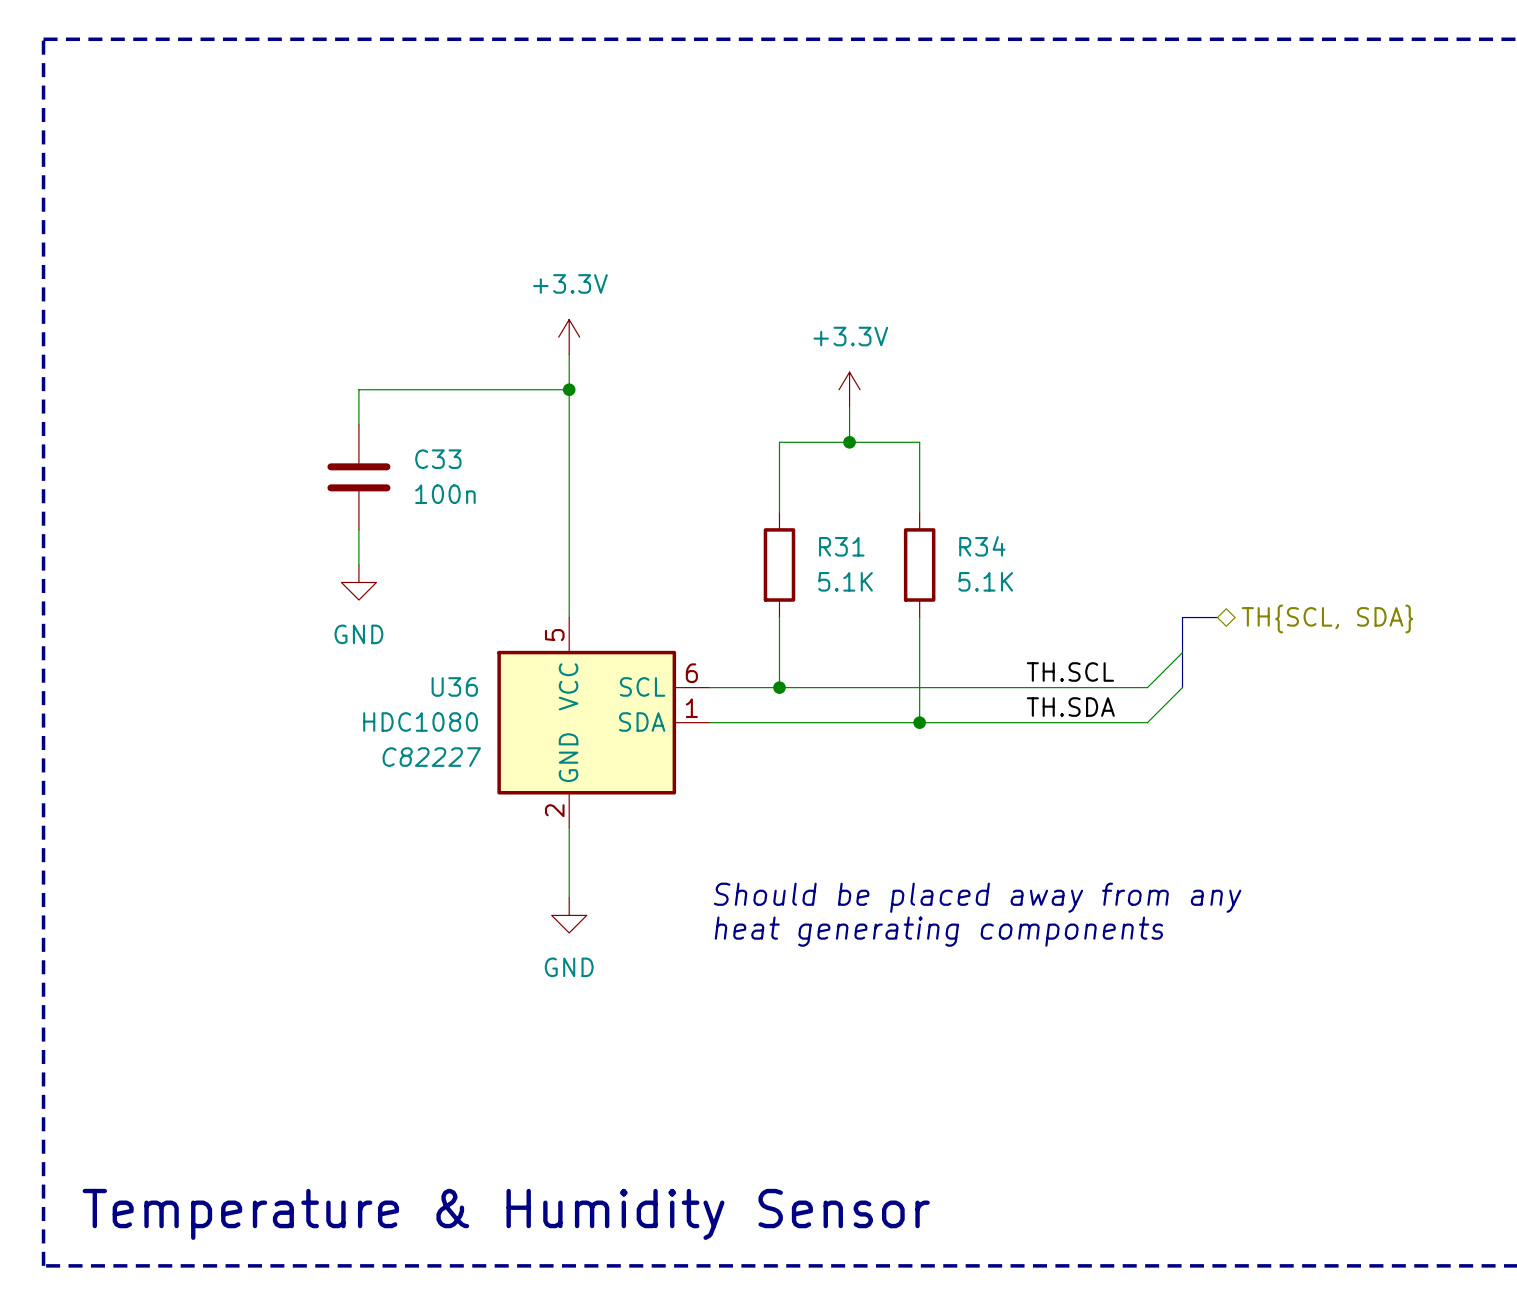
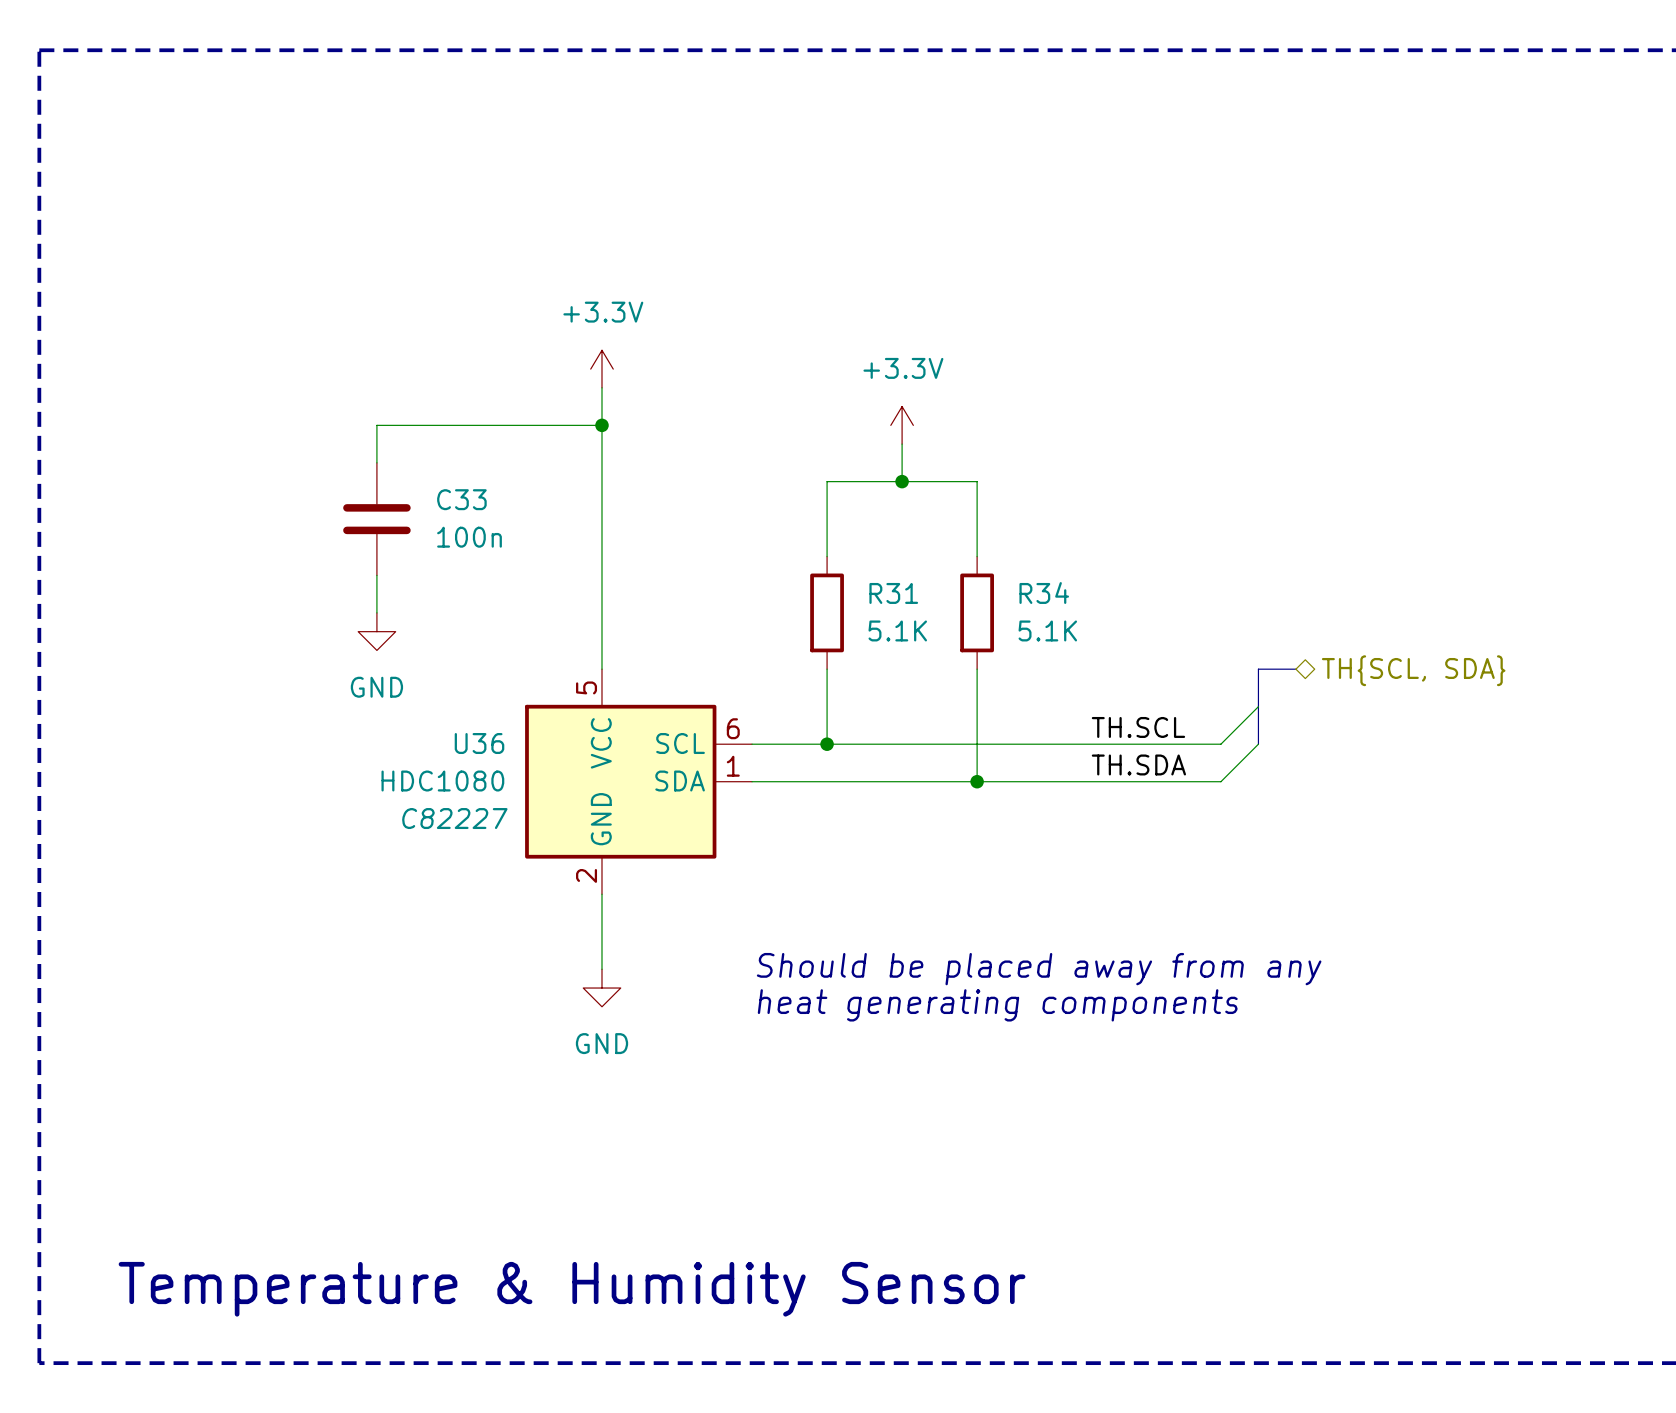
text position: Temperature & Humidity Sensor (506, 1214) -> Temperature & Humidity Sensor (572, 1289)

